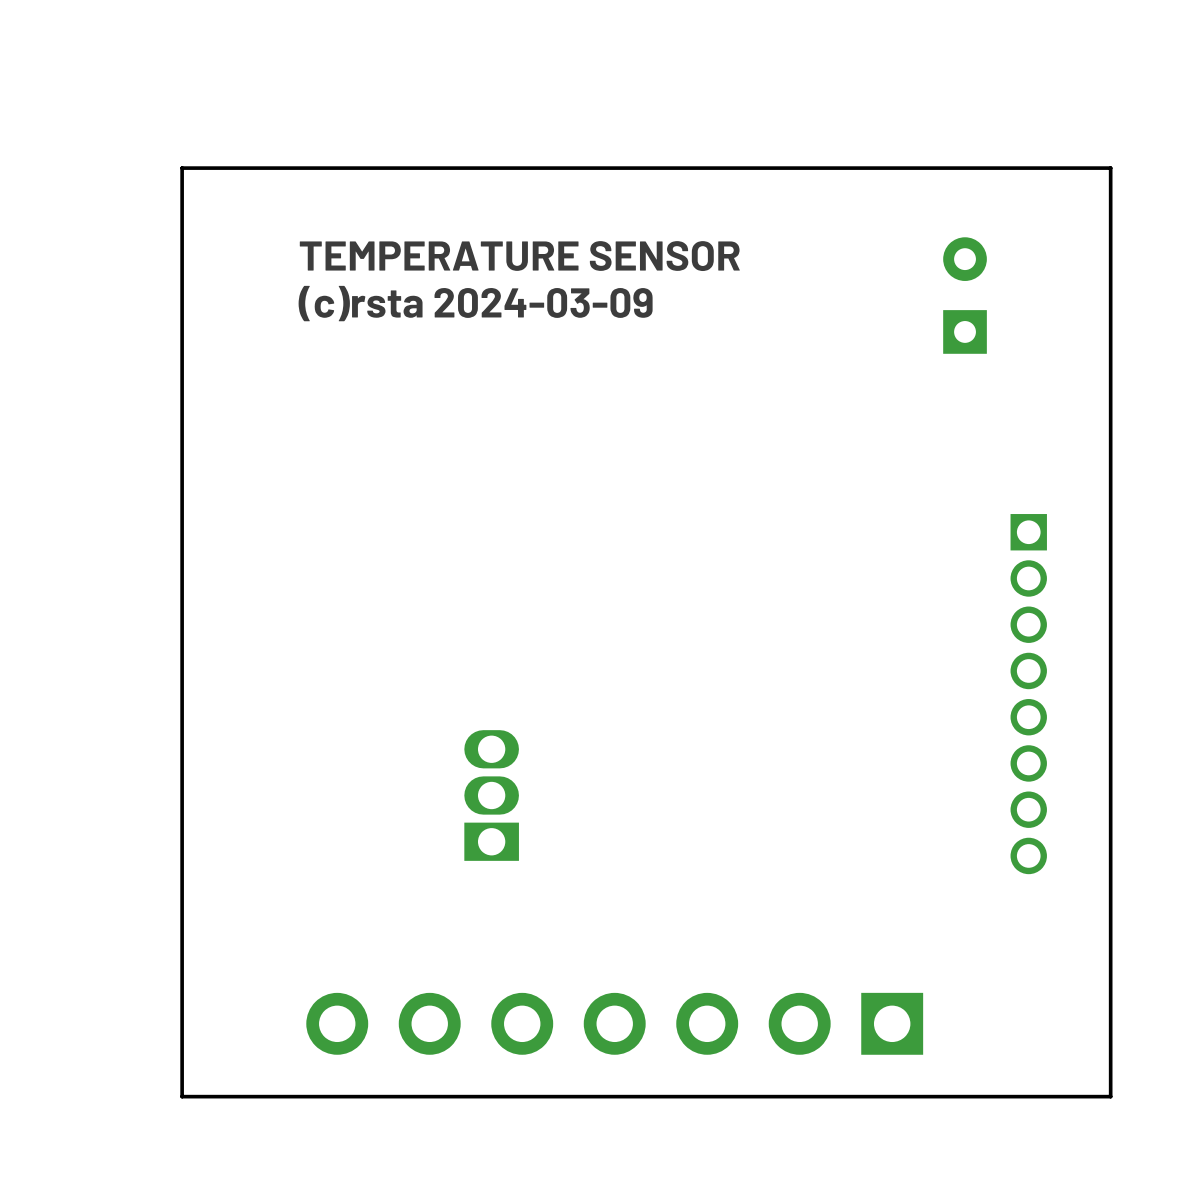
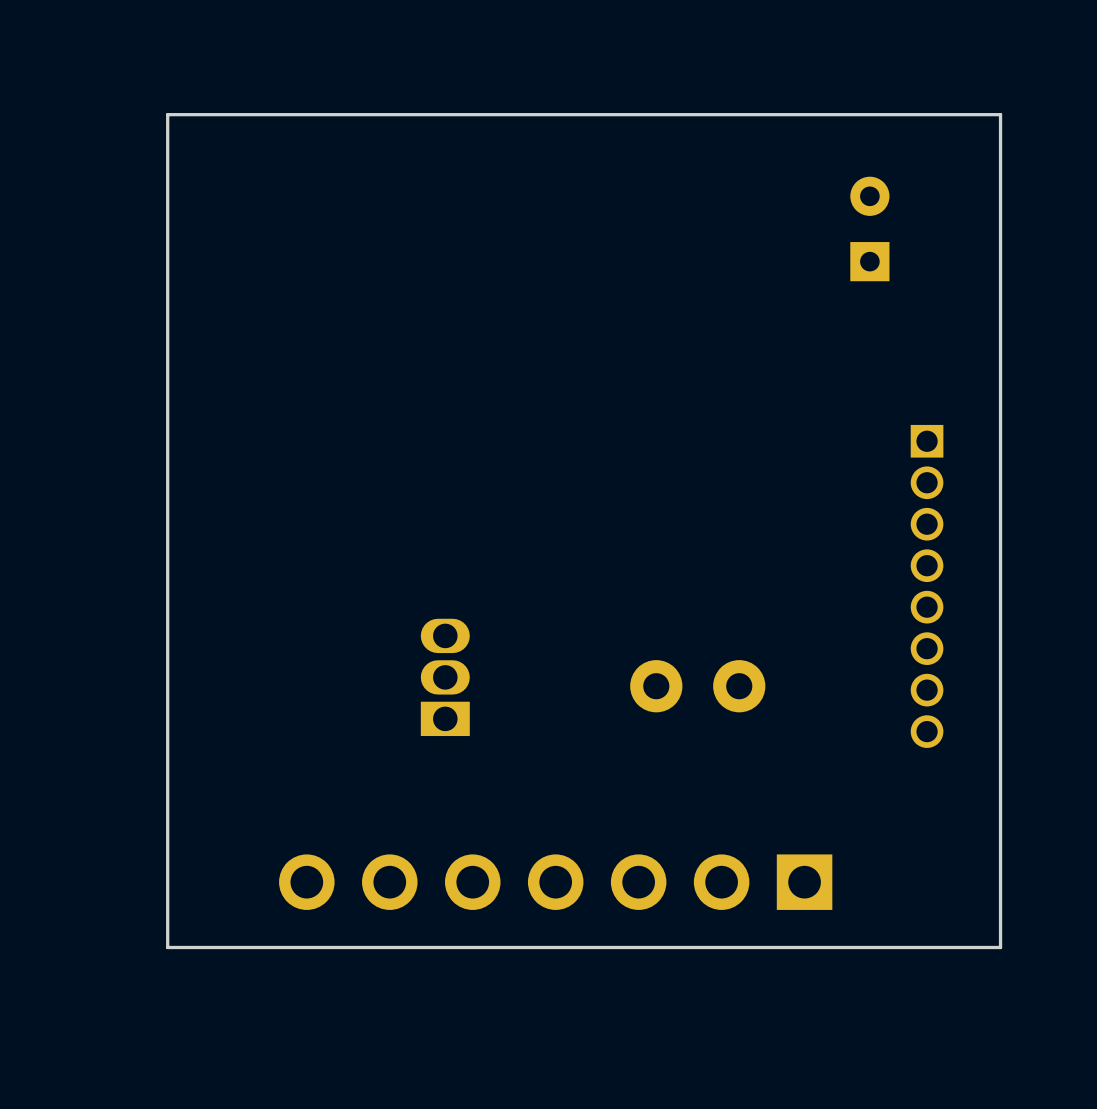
text: TEMPERATURE SENSOR (519, 256) -> none
text: (c)rsta 2024-03-09 (475, 303) -> none
part: none -> (697, 686)

